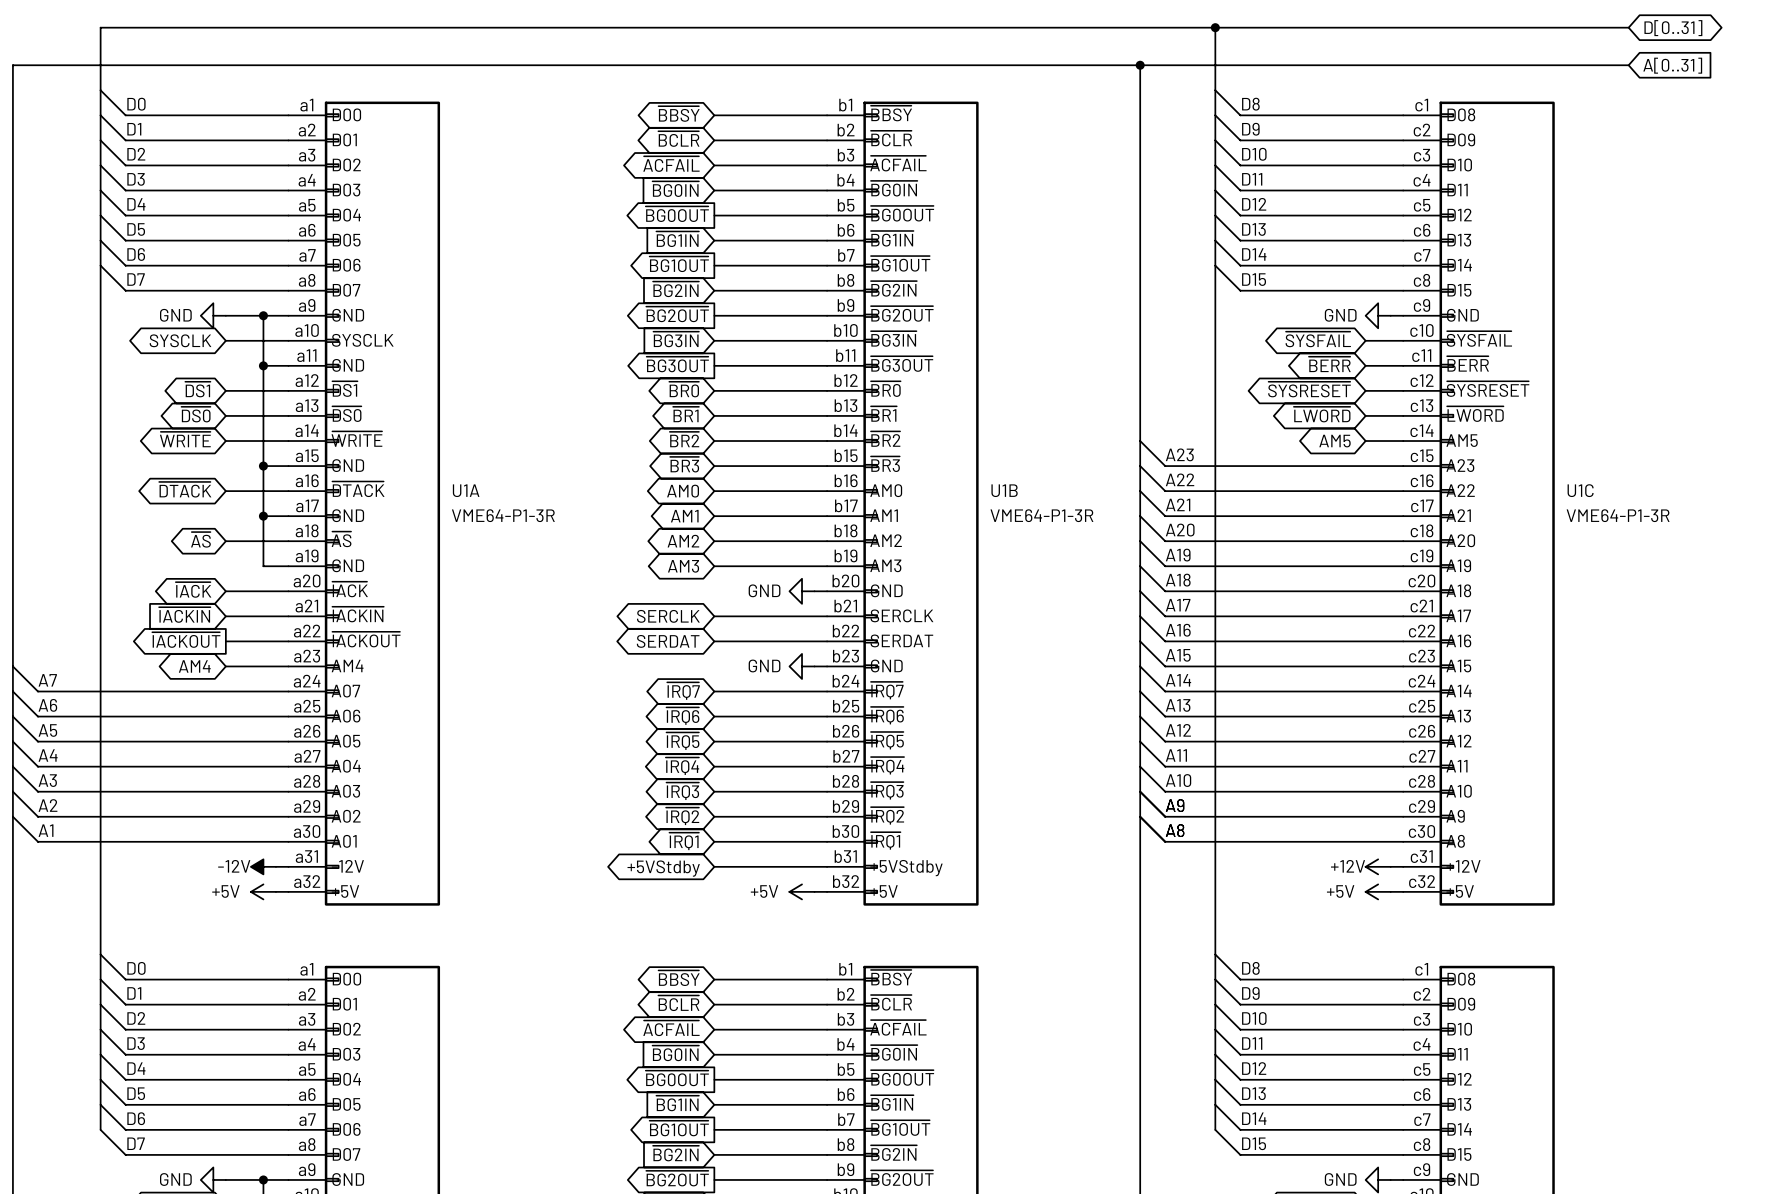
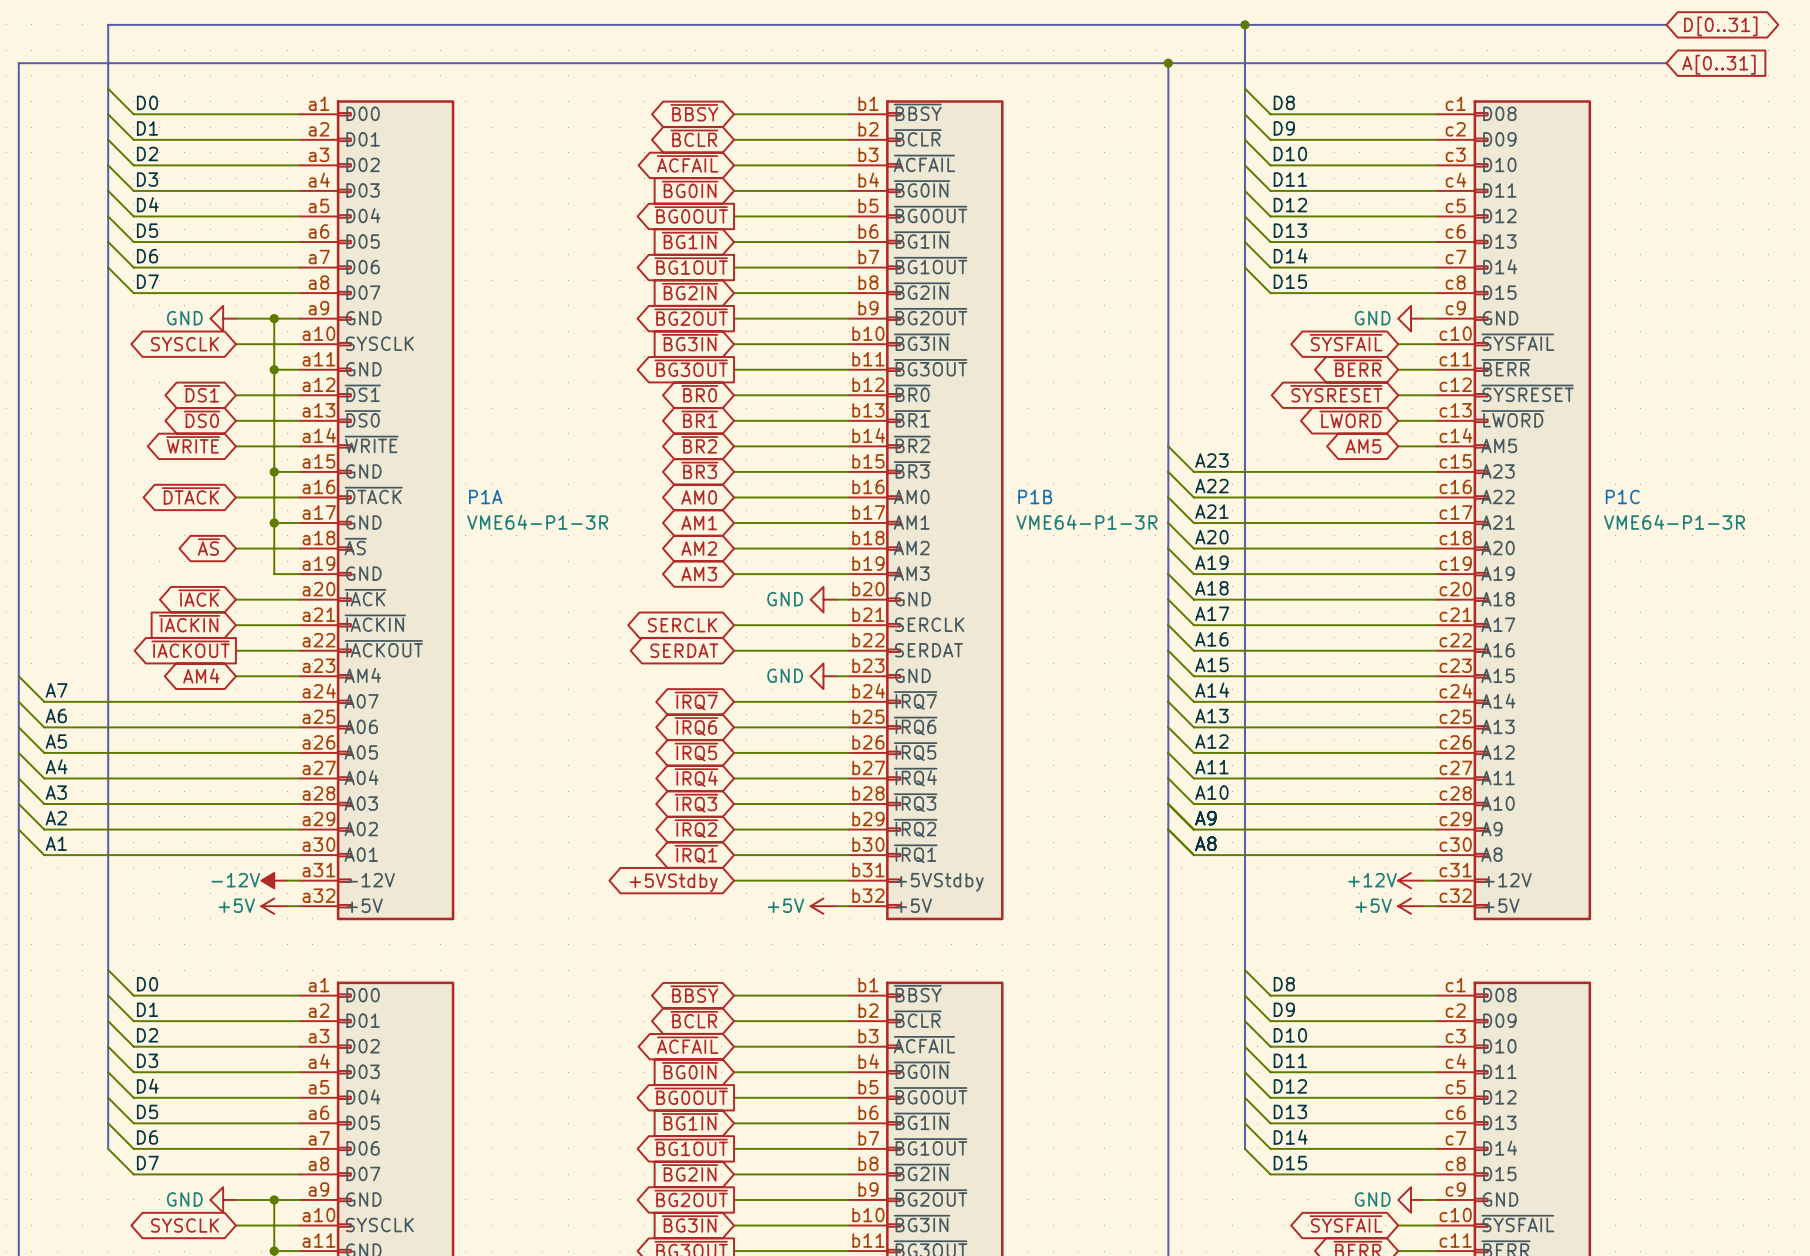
U1A name: U1A (466, 490) -> P1A (485, 496)
U1B name: U1B (1004, 490) -> P1B (1035, 496)
U1C name: U1C (1580, 490) -> P1C (1622, 496)

